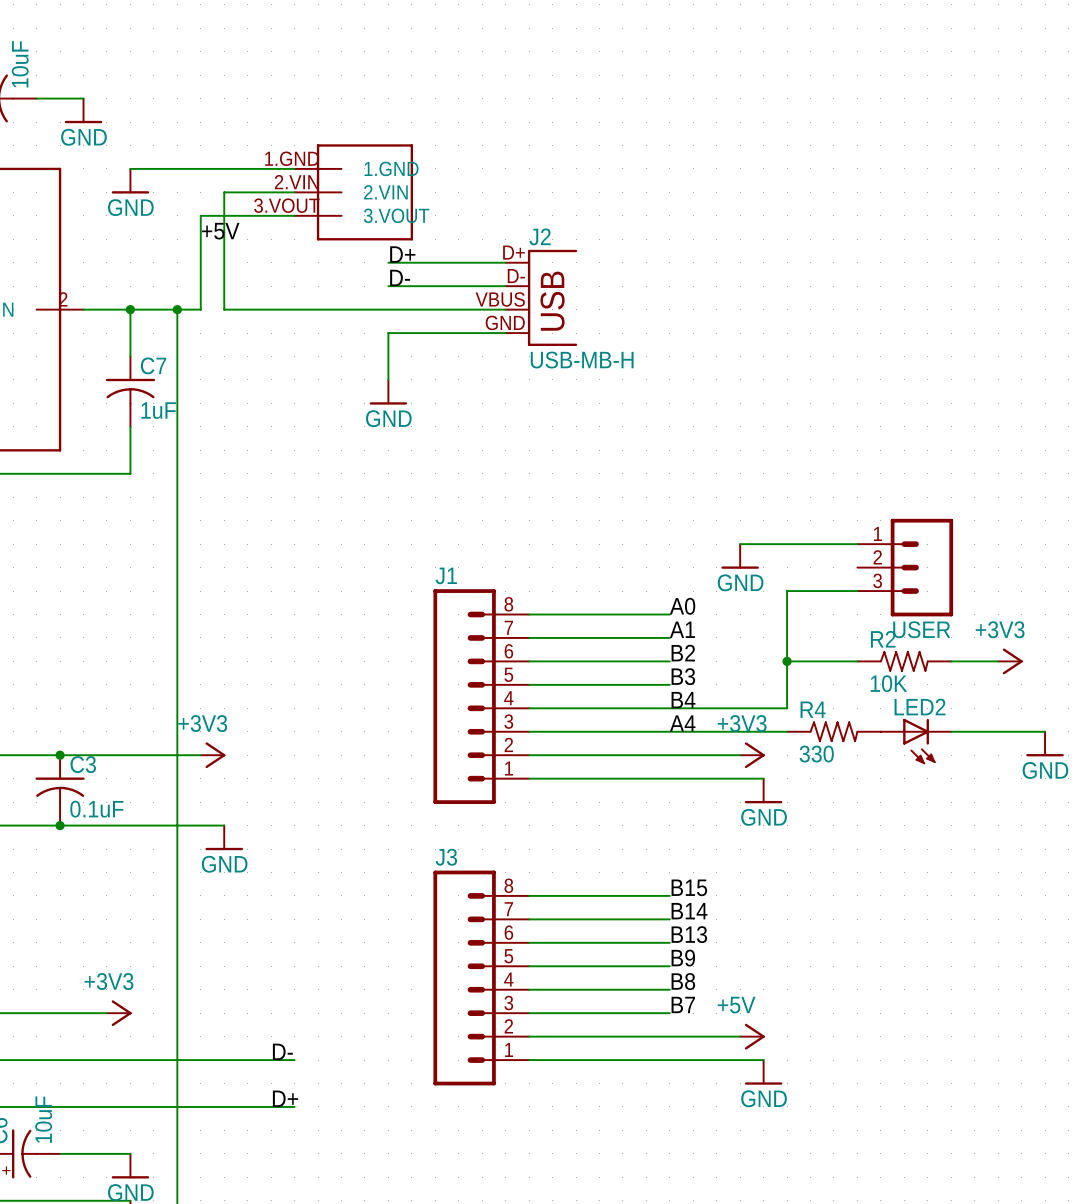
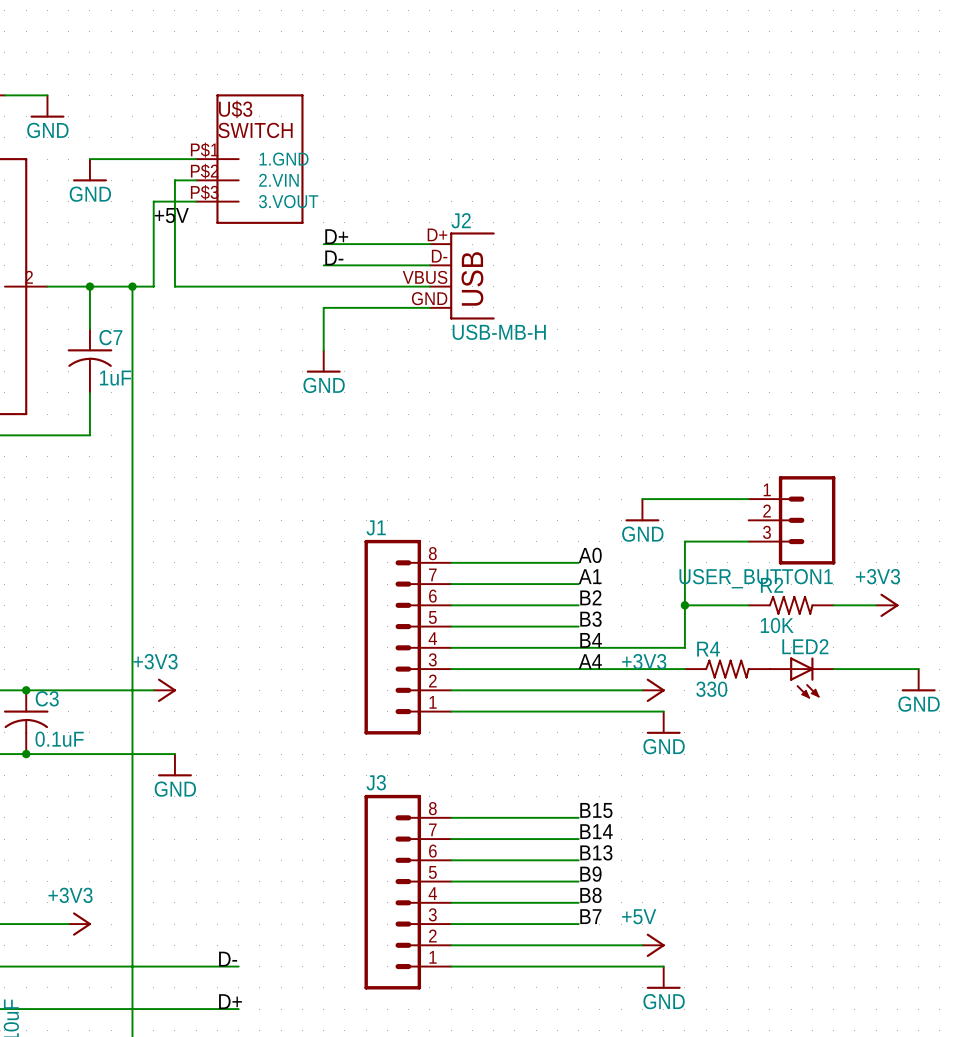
U$3: none -> SWITCH (249, 159)
part: (353, 192) -> none
USER name: USER (921, 629) -> USER_BUTTON1 (756, 578)

